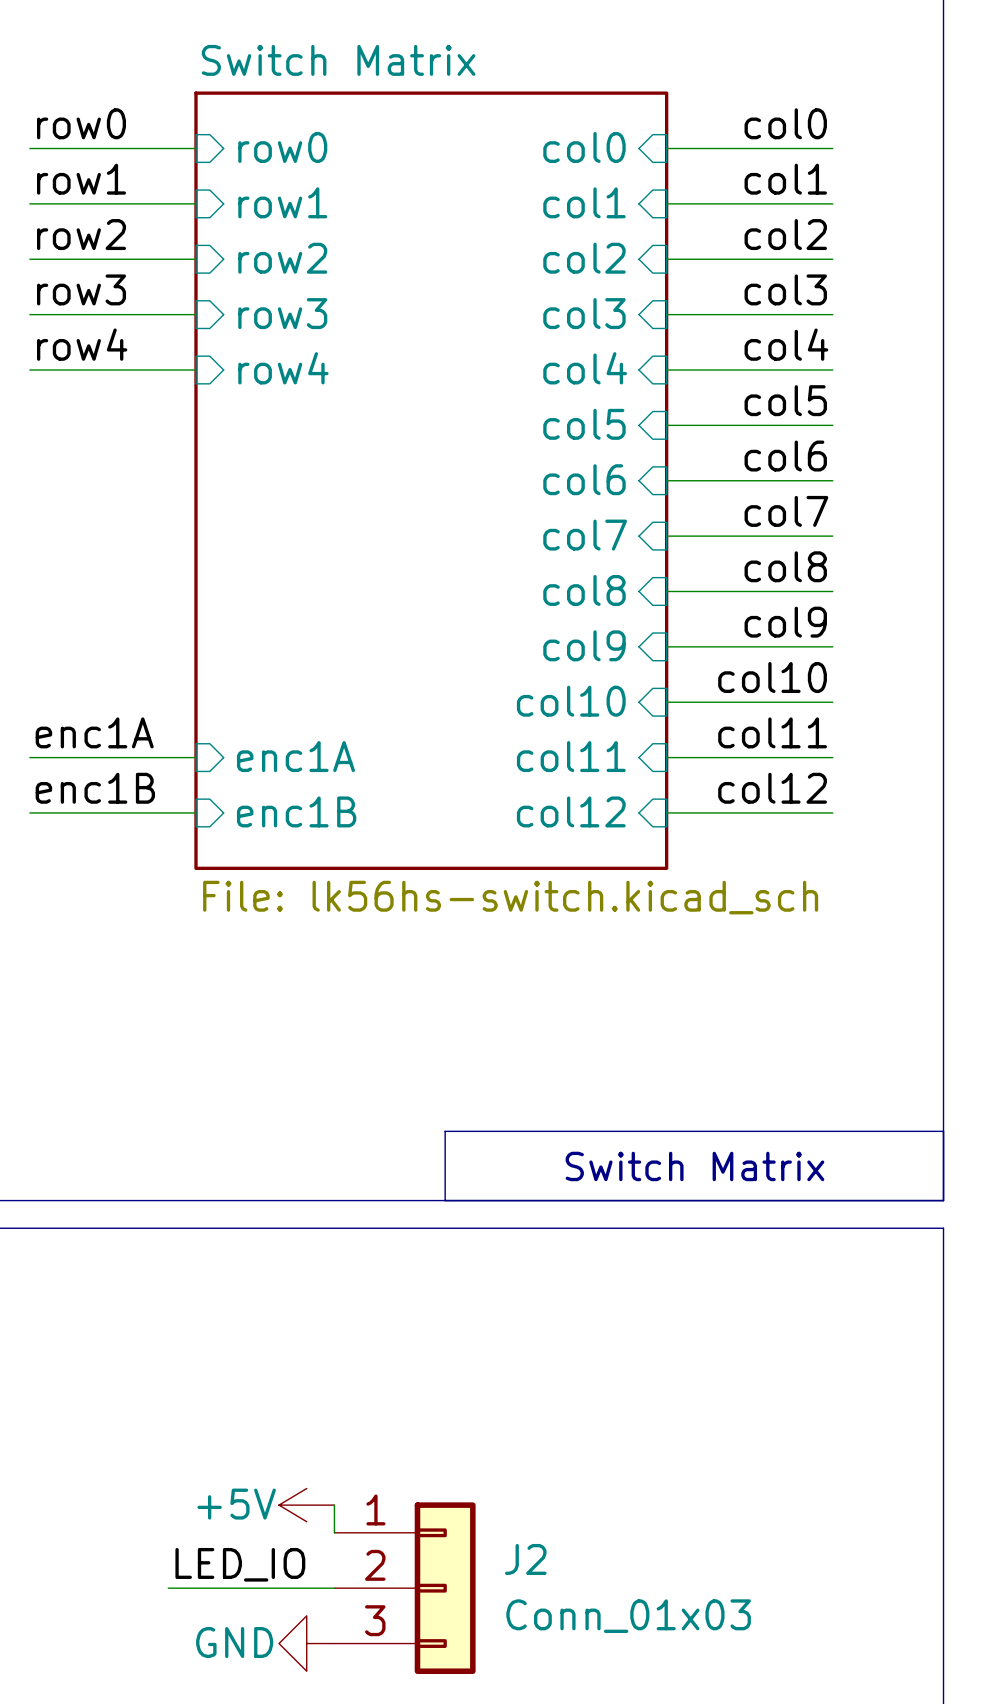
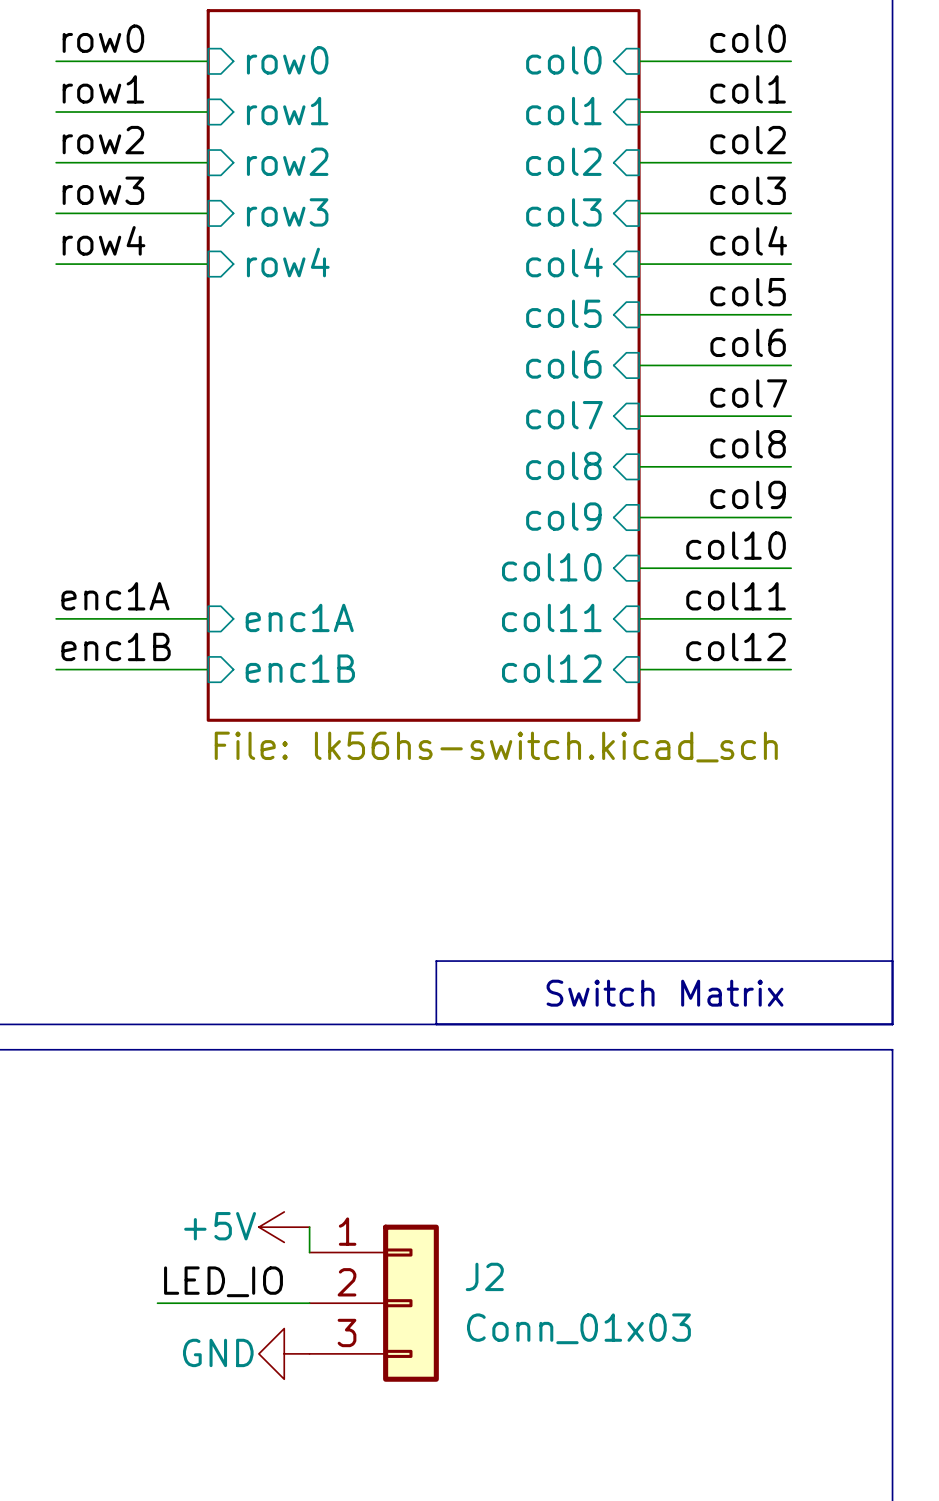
power symbol position: +5V (306, 1505) -> +5V (284, 1227)
wire: (334, 1505) (334, 1532) -> (309, 1227) (309, 1252)
label position: LED_IO (240, 1564) -> LED_IO (223, 1281)
wire: (168, 1588) (334, 1588) -> (157, 1303) (309, 1303)
J2 position: (405, 1588) -> (374, 1303)
power symbol position: GND (306, 1643) -> GND (284, 1353)

